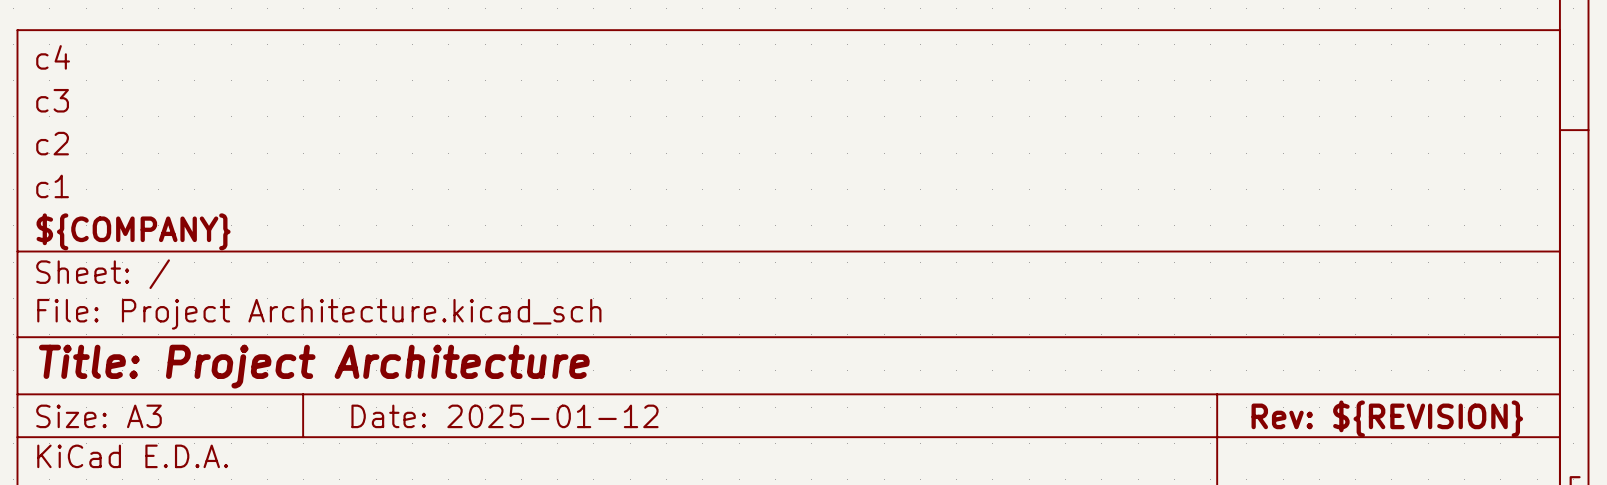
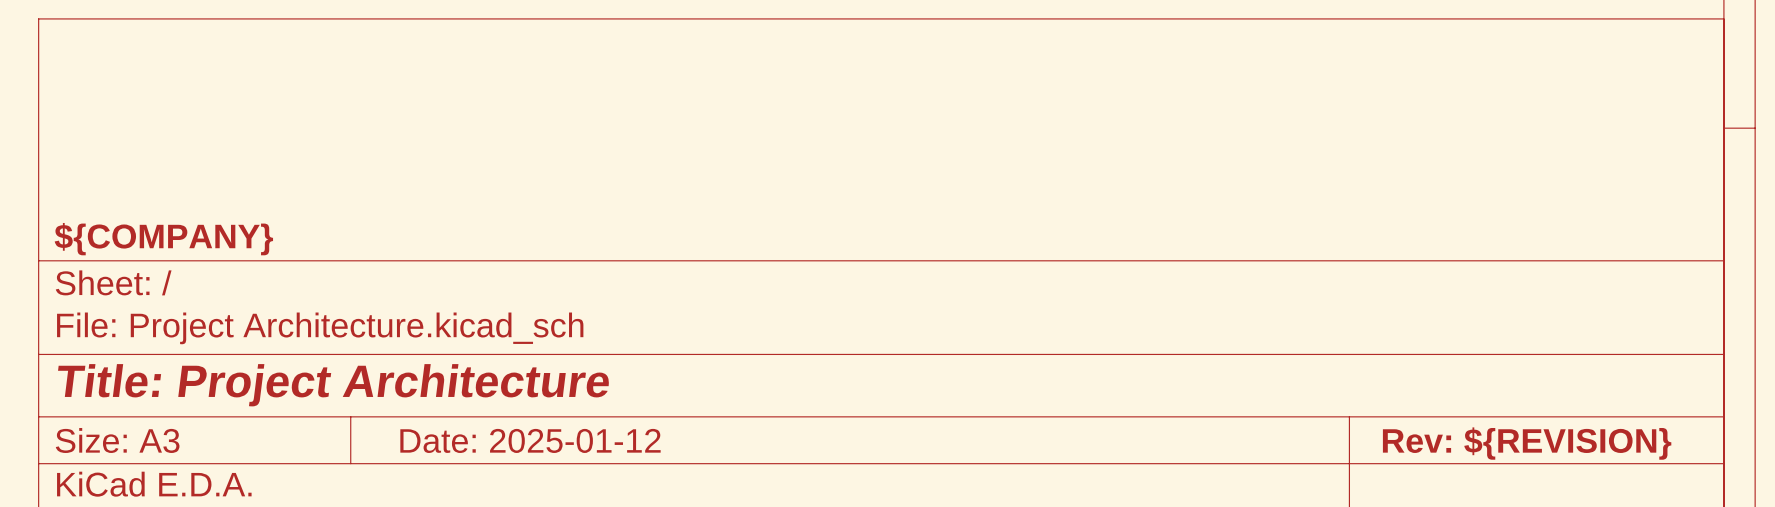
title block: c4 (53, 57) -> none
title block: c3 (52, 100) -> none
title block: c2 (52, 143) -> none
title block: c1 (52, 186) -> none

